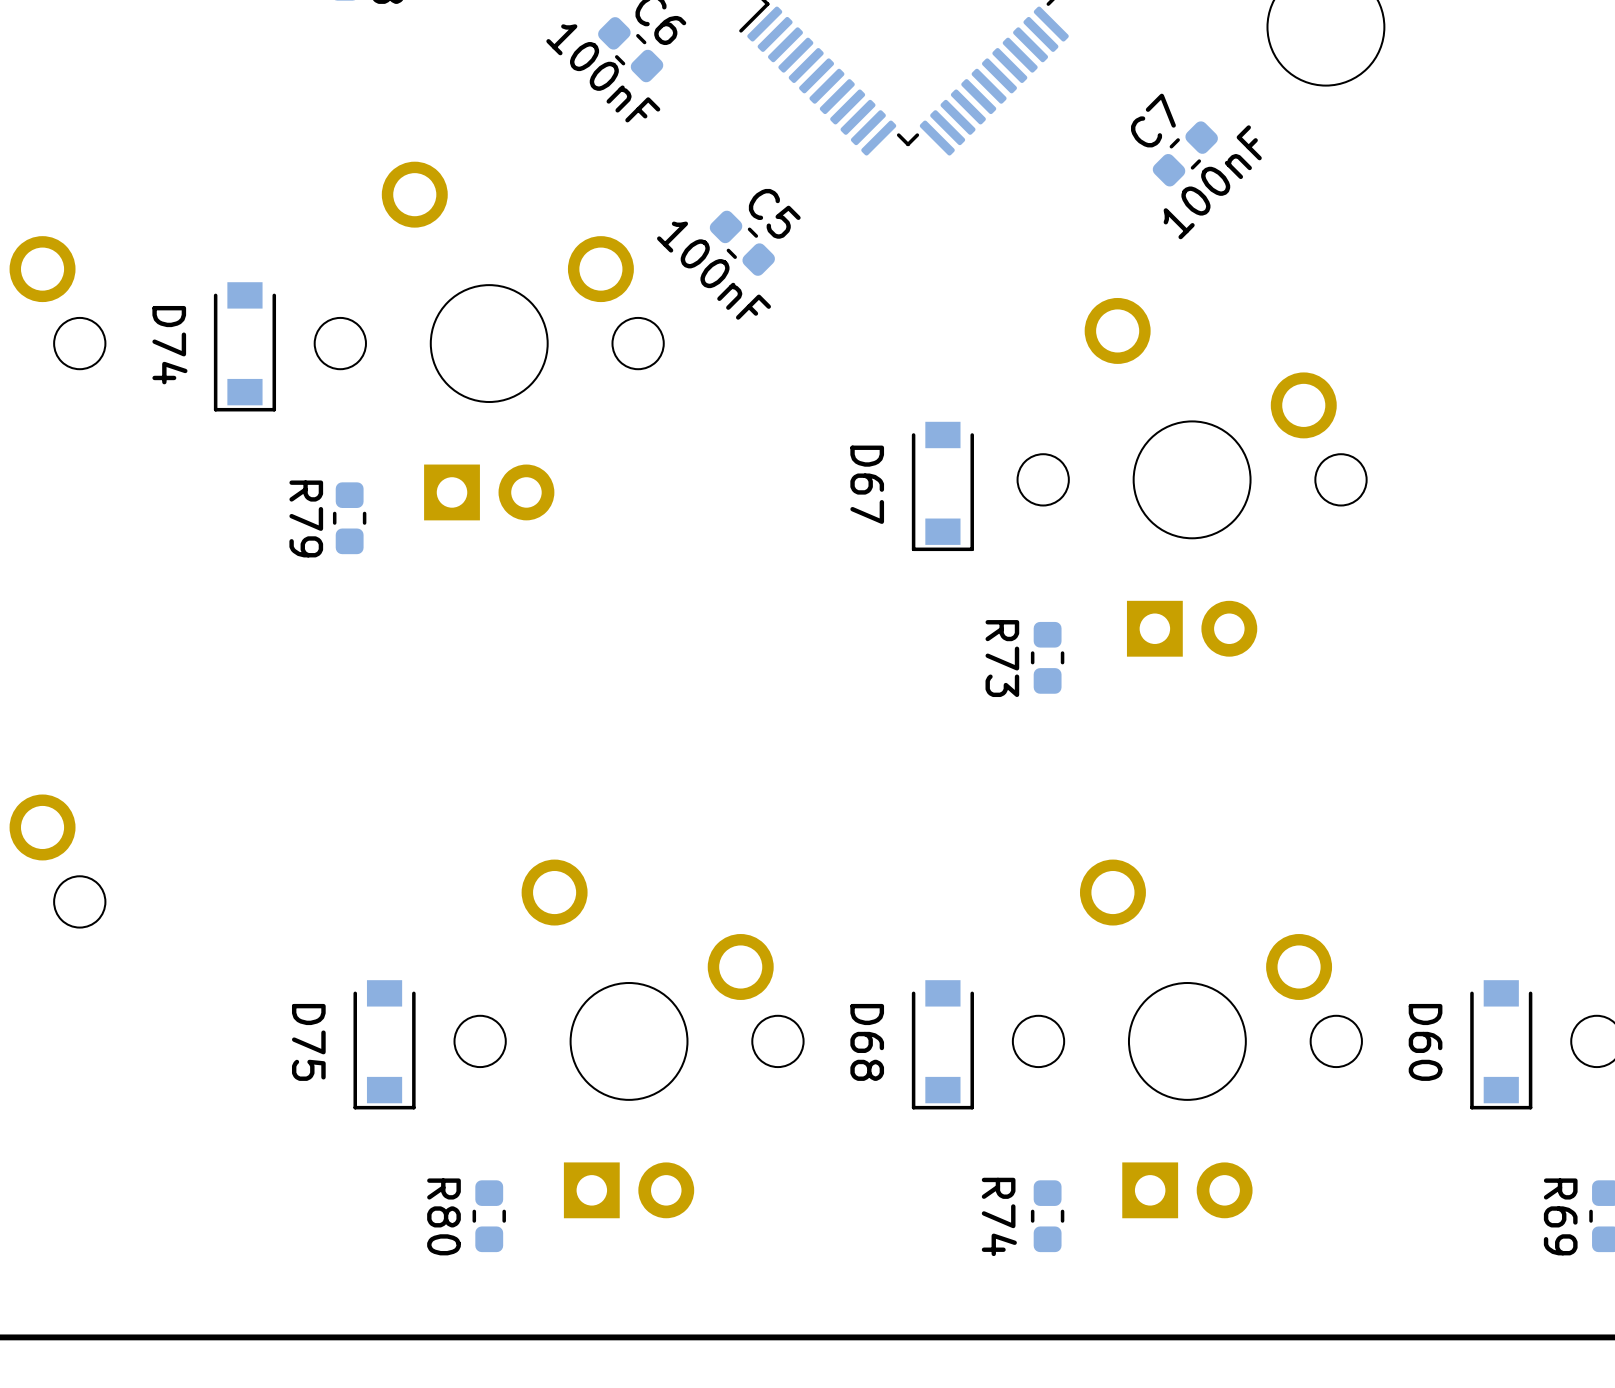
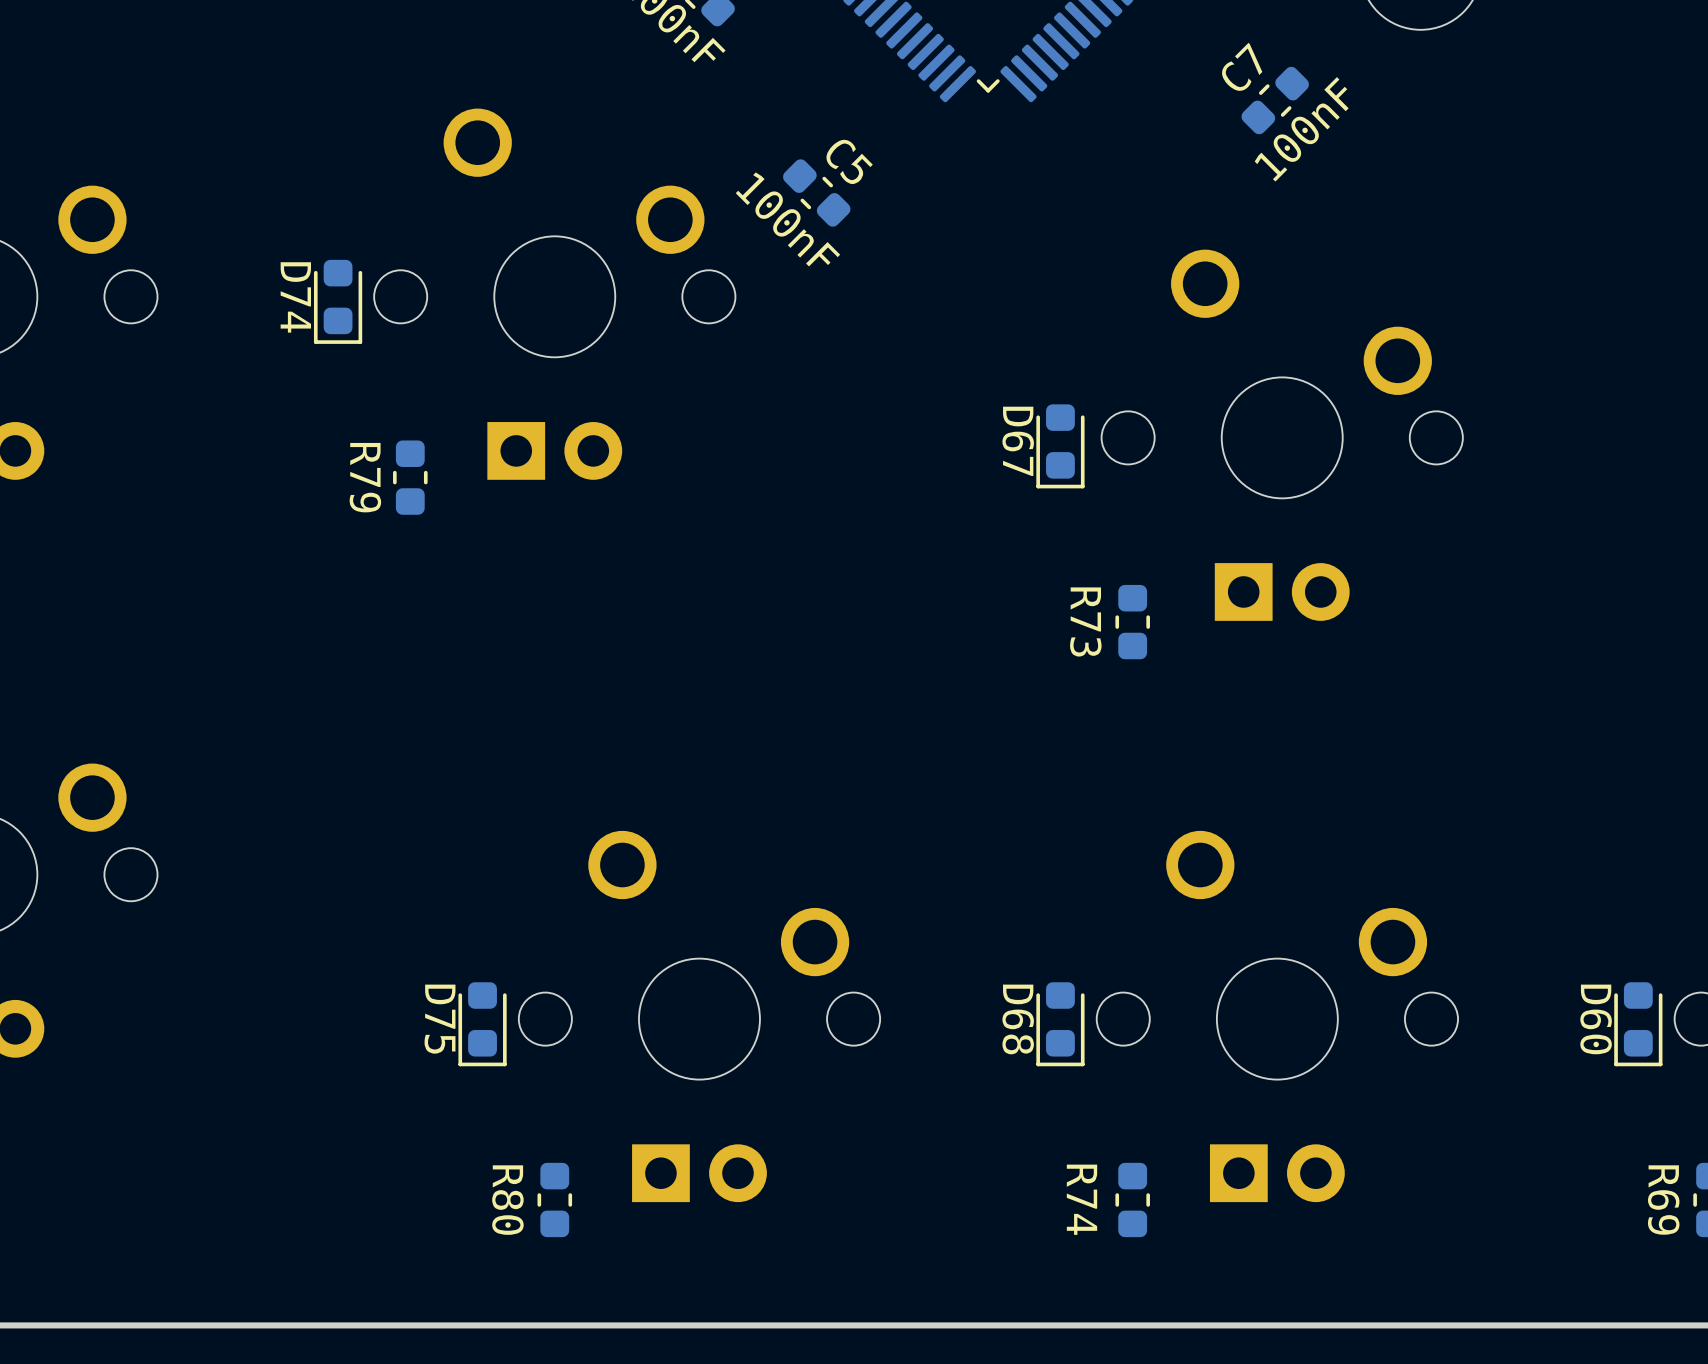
D74 footprint: [213, 282, 277, 412] -> [313, 259, 363, 344]
D67 footprint: [911, 421, 974, 552] -> [1036, 404, 1085, 489]
D75 footprint: [353, 980, 416, 1110] -> [458, 982, 507, 1067]
D68 footprint: [911, 980, 974, 1110] -> [1036, 982, 1085, 1067]
D60 footprint: [1470, 980, 1533, 1110] -> [1614, 982, 1663, 1067]

